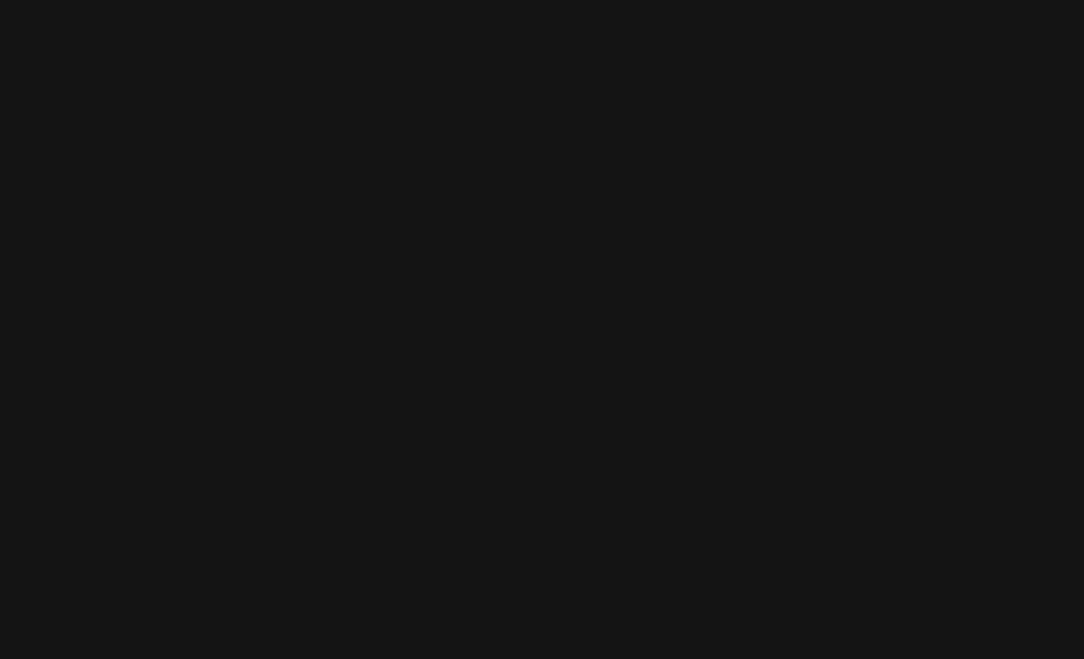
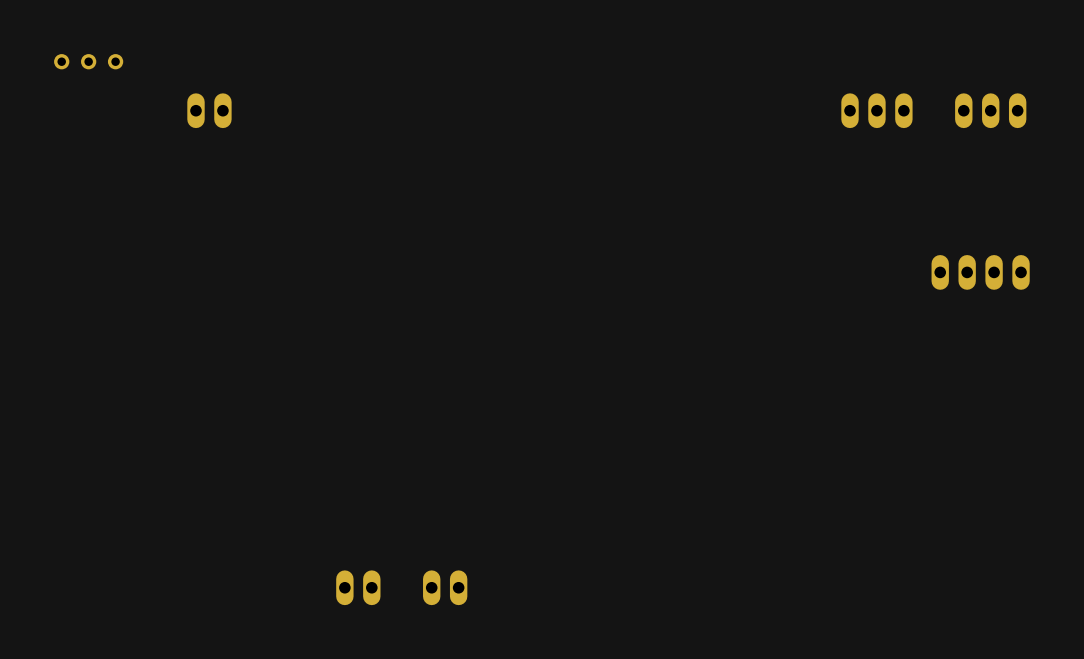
part: none -> (88, 61)
part: none -> (209, 110)
part: none -> (876, 110)
part: none -> (990, 110)
part: none -> (980, 272)
part: none -> (358, 587)
part: none -> (445, 587)

